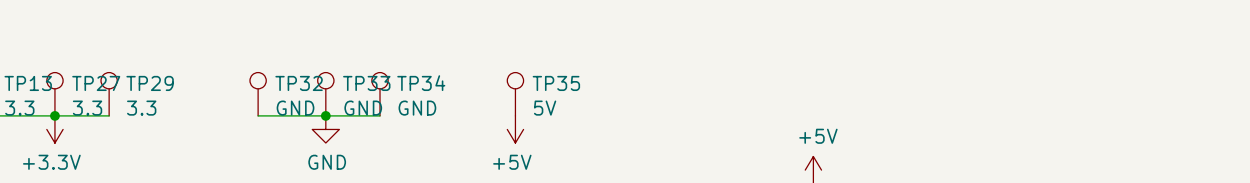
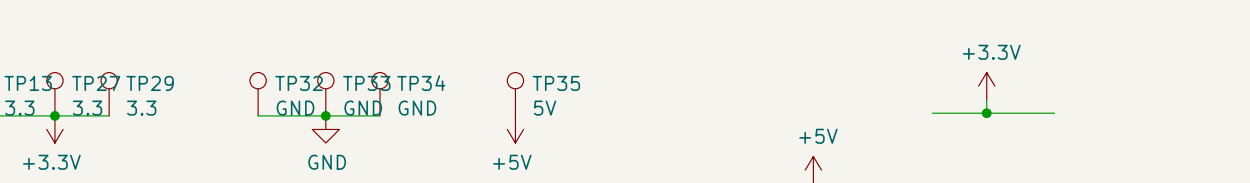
power symbol: none -> +3.3V (986, 86)
wire: none -> (986, 99) (986, 113)
wire: none -> (932, 113) (1054, 113)
junction: none -> (986, 113)

